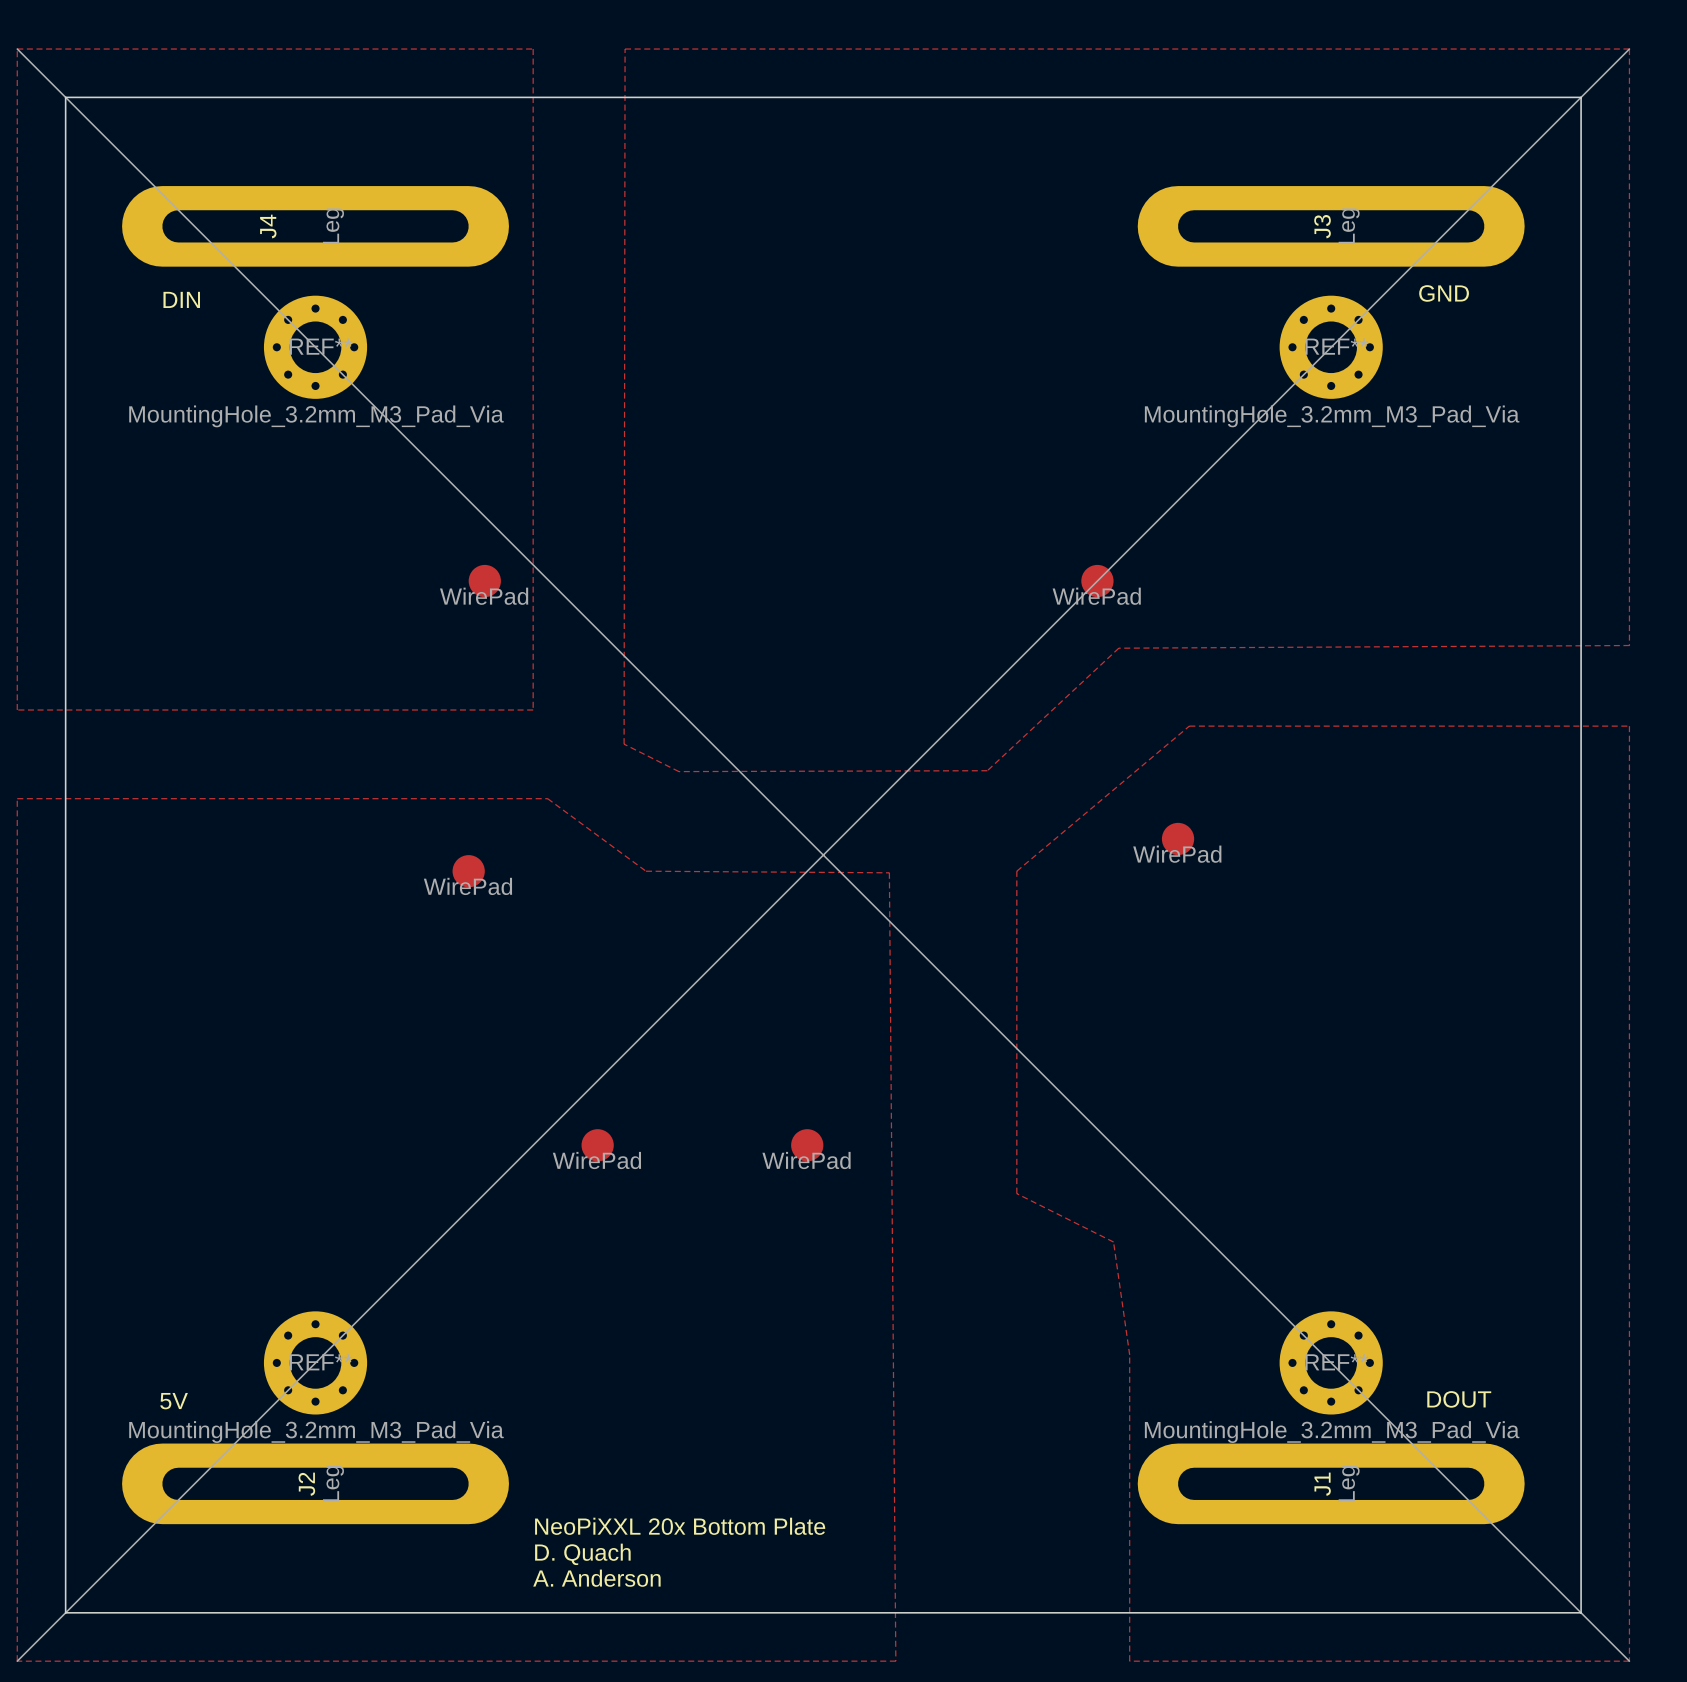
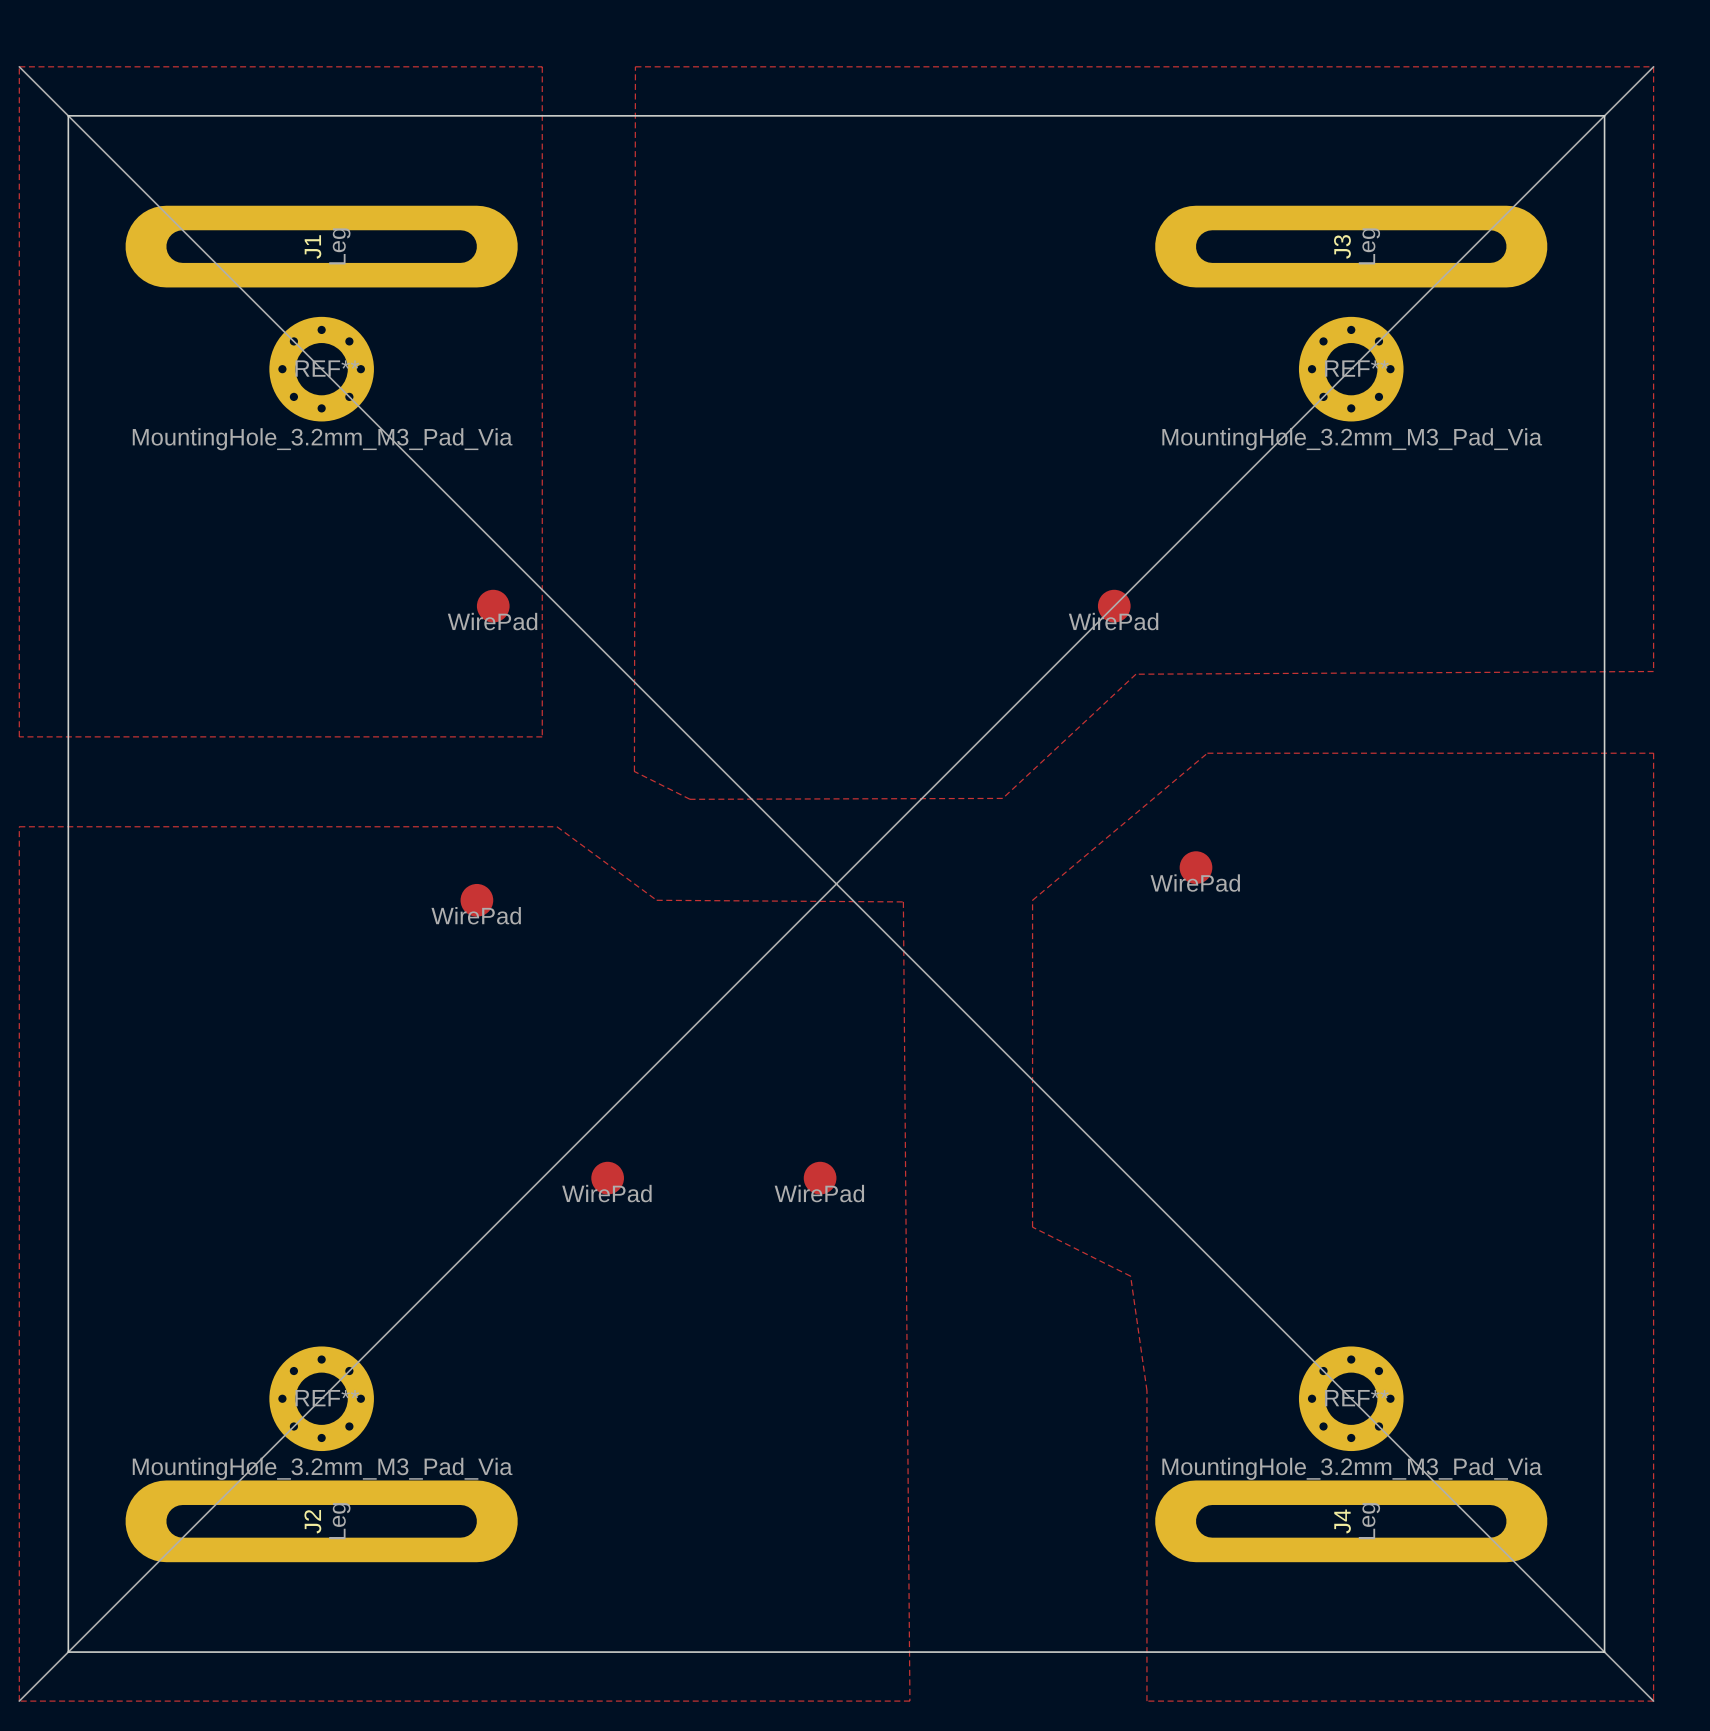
J4 name: J4 (268, 226) -> J1 (312, 246)
text: GND (1444, 293) -> none
text: DIN (181, 299) -> none
text: DOUT (1459, 1399) -> none
text: 5V (174, 1401) -> none
J1 name: J1 (1322, 1484) -> J4 (1342, 1521)
text: NeoPiXXL 20x Bottom Plate (680, 1526) -> none
text: D. Quach (582, 1554) -> none
text: A. Anderson (596, 1578) -> none

